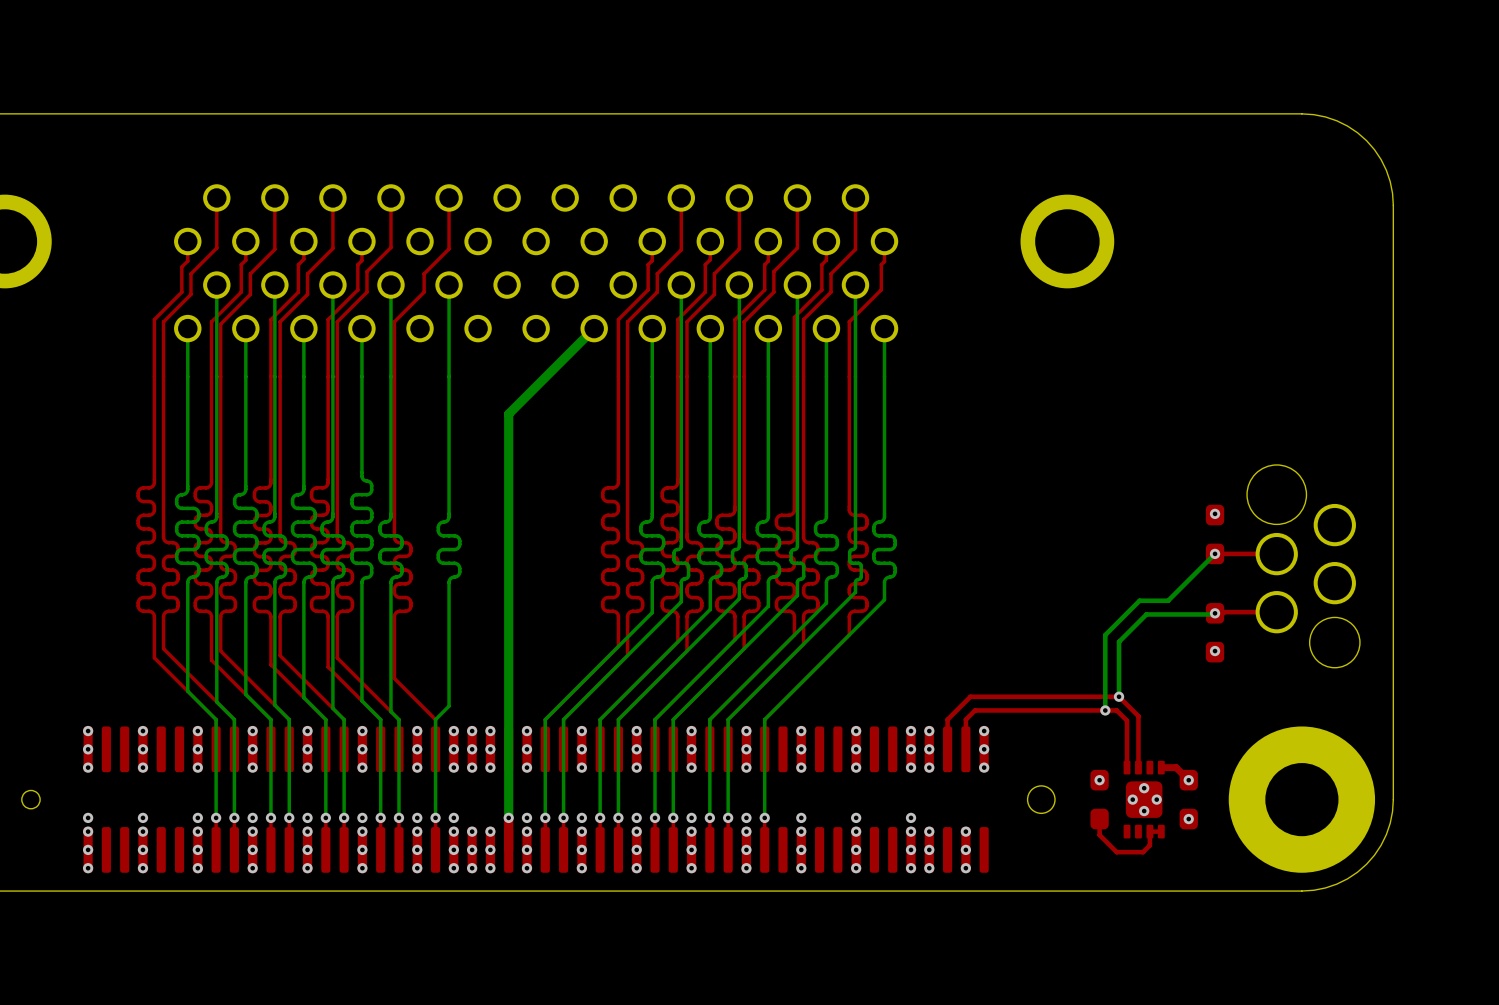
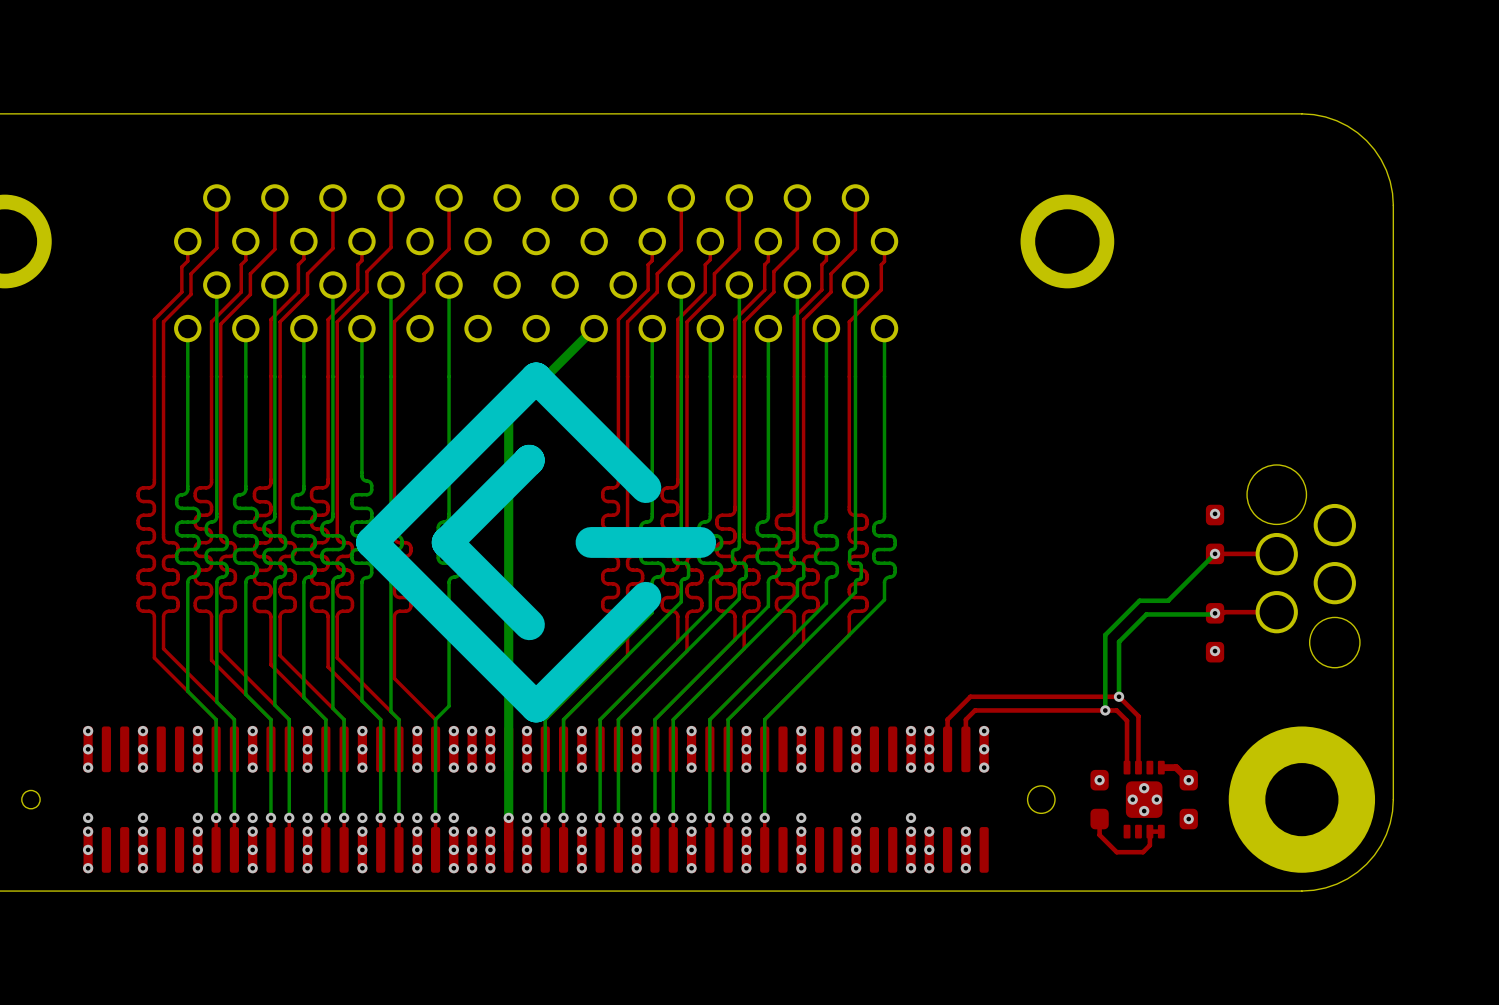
line: none -> (529, 460) (447, 542) (529, 624)
line: none -> (645, 487) (536, 377) (371, 542) (536, 707) (645, 597)
line: none -> (700, 542) (590, 542)

